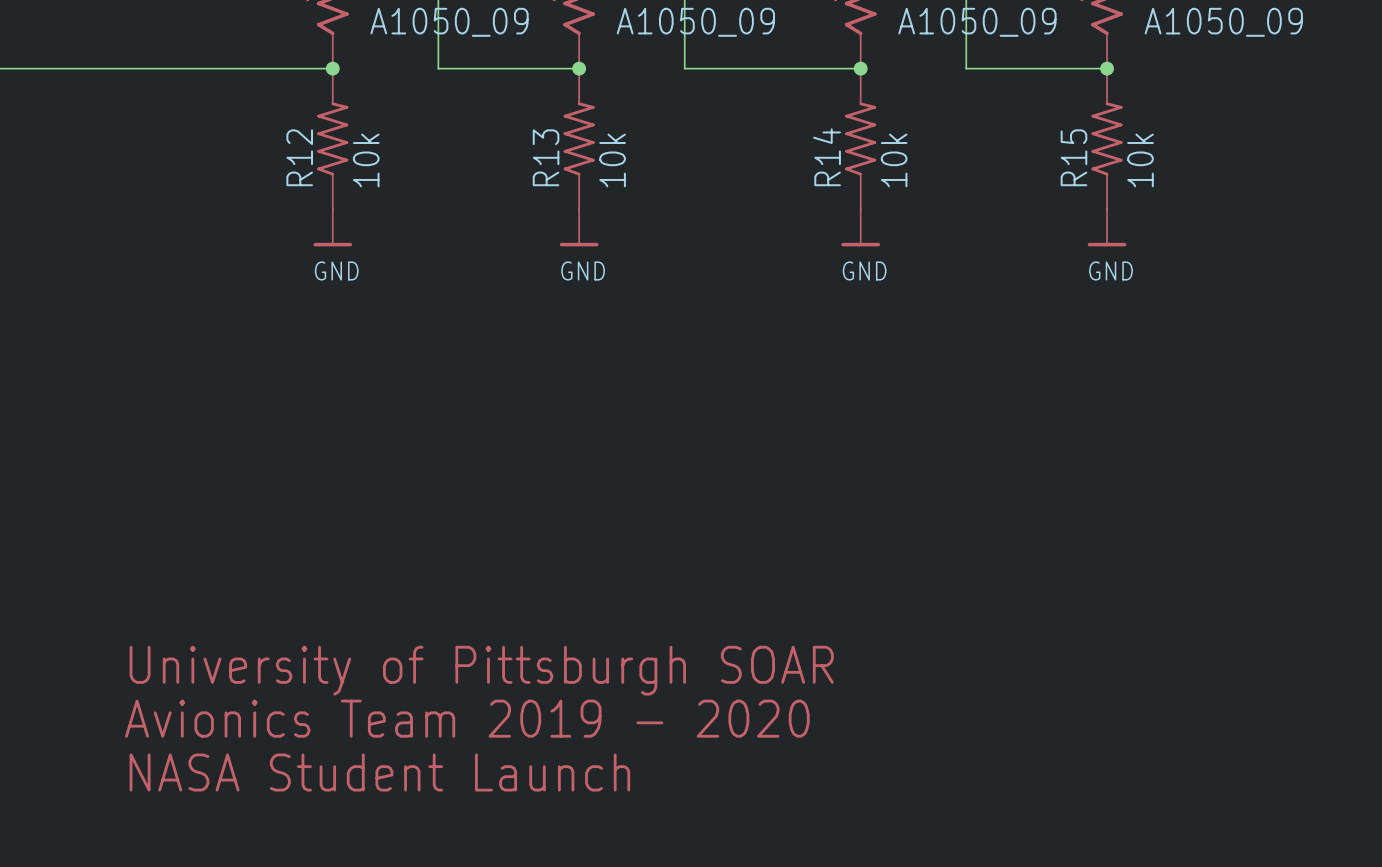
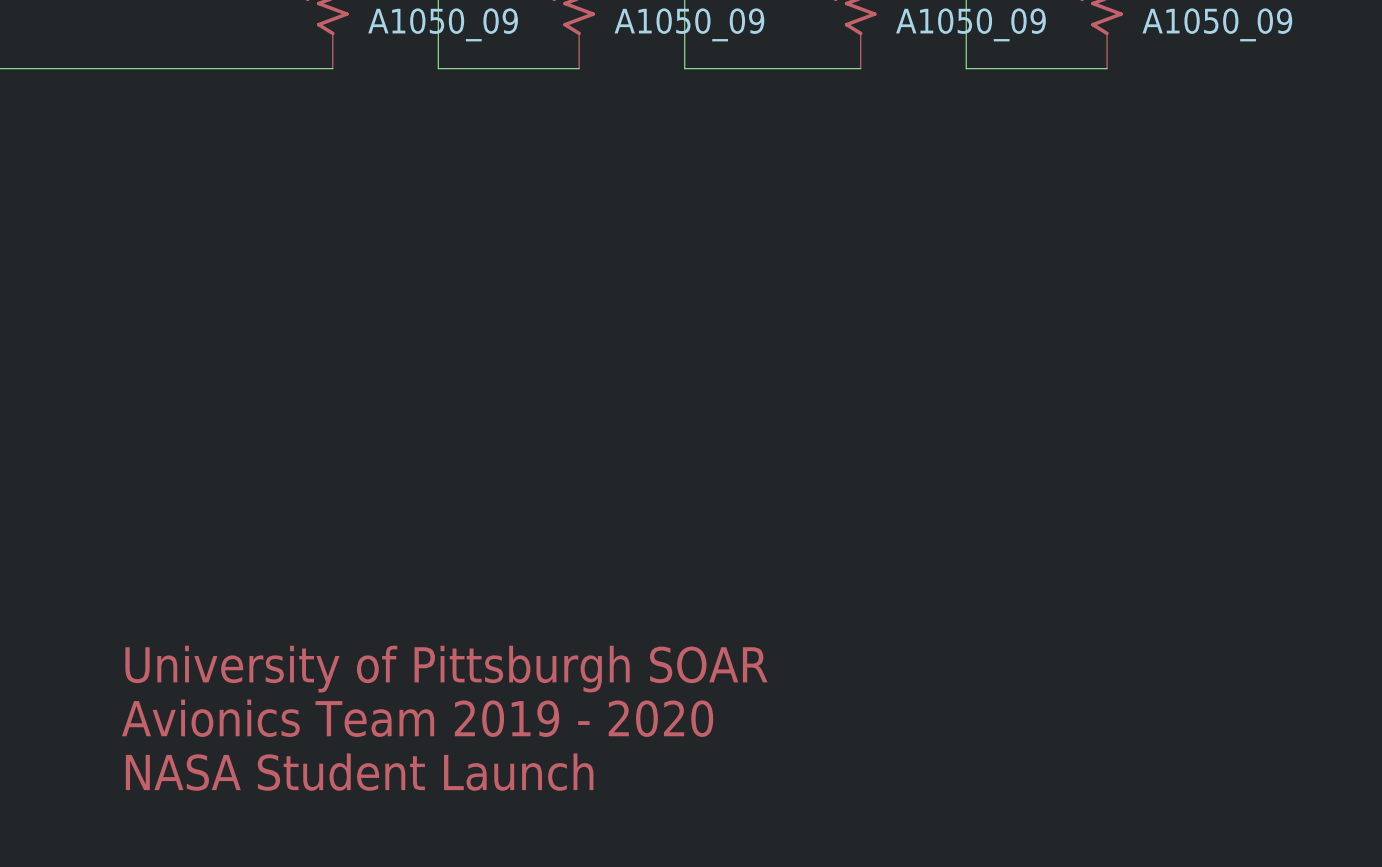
junction: (332, 68) -> none
junction: (579, 68) -> none
junction: (860, 68) -> none
junction: (1107, 68) -> none
R12: 10k (332, 139) -> none
R13: 10k (579, 139) -> none
R14: 10k (860, 139) -> none
R15: 10k (1107, 139) -> none
power symbol: GND (332, 227) -> none
power symbol: GND (579, 227) -> none
power symbol: GND (860, 227) -> none
power symbol: GND (1107, 227) -> none

